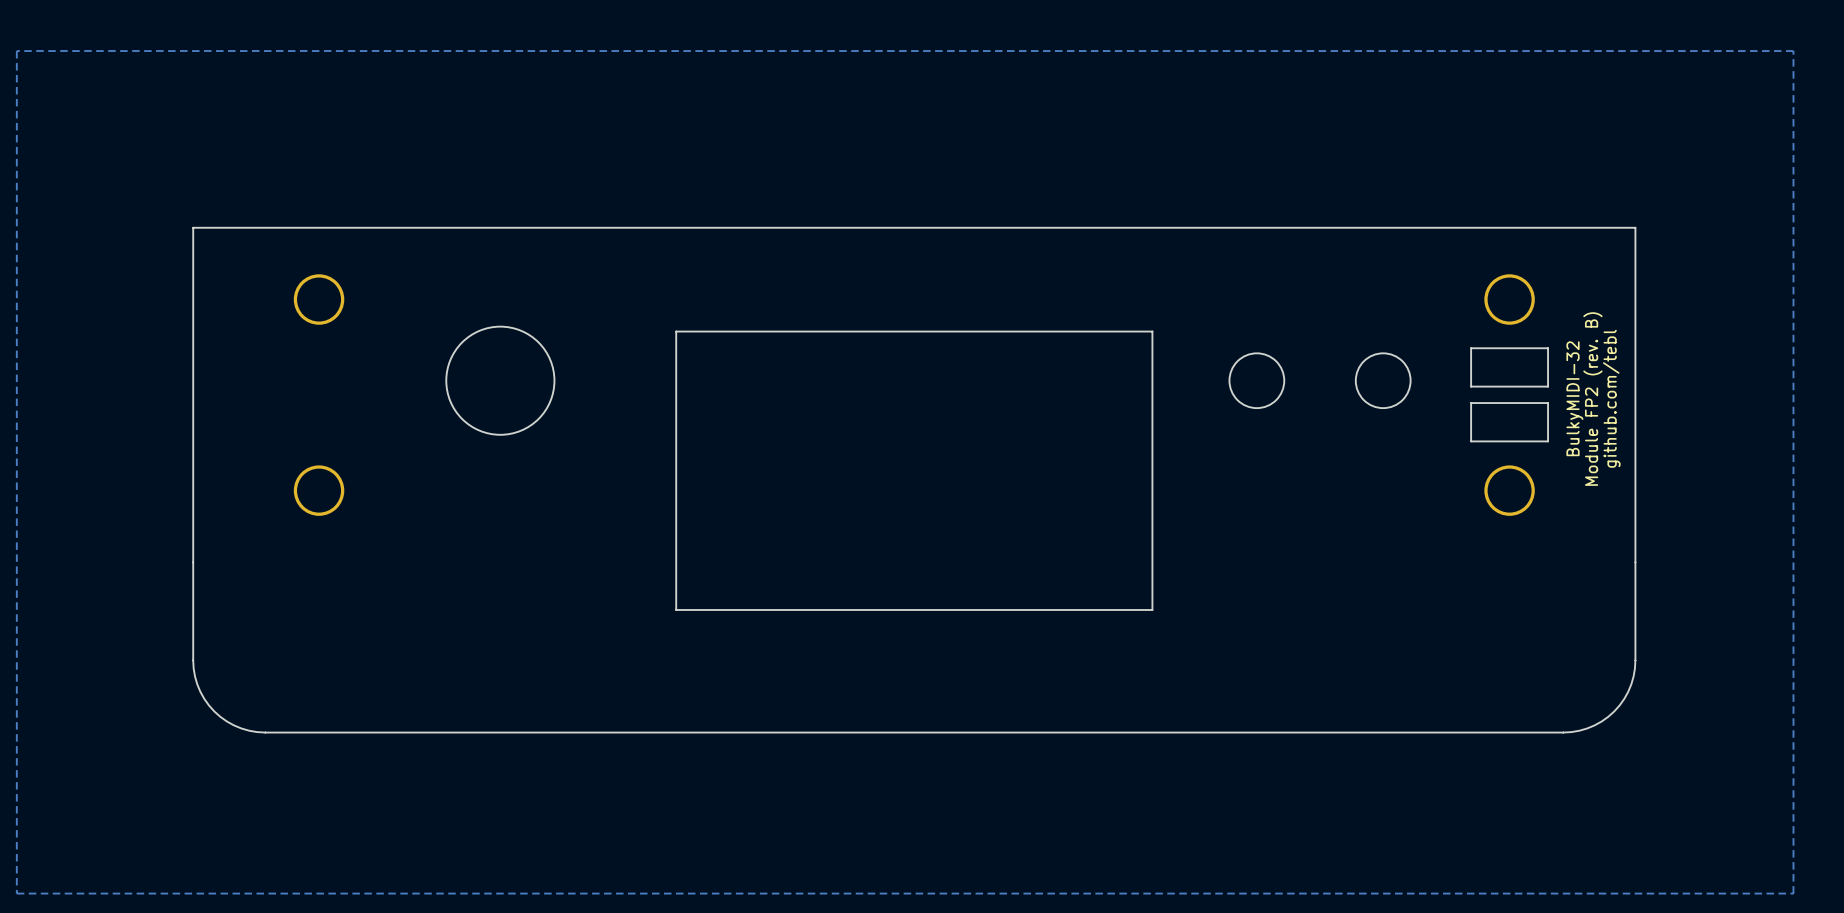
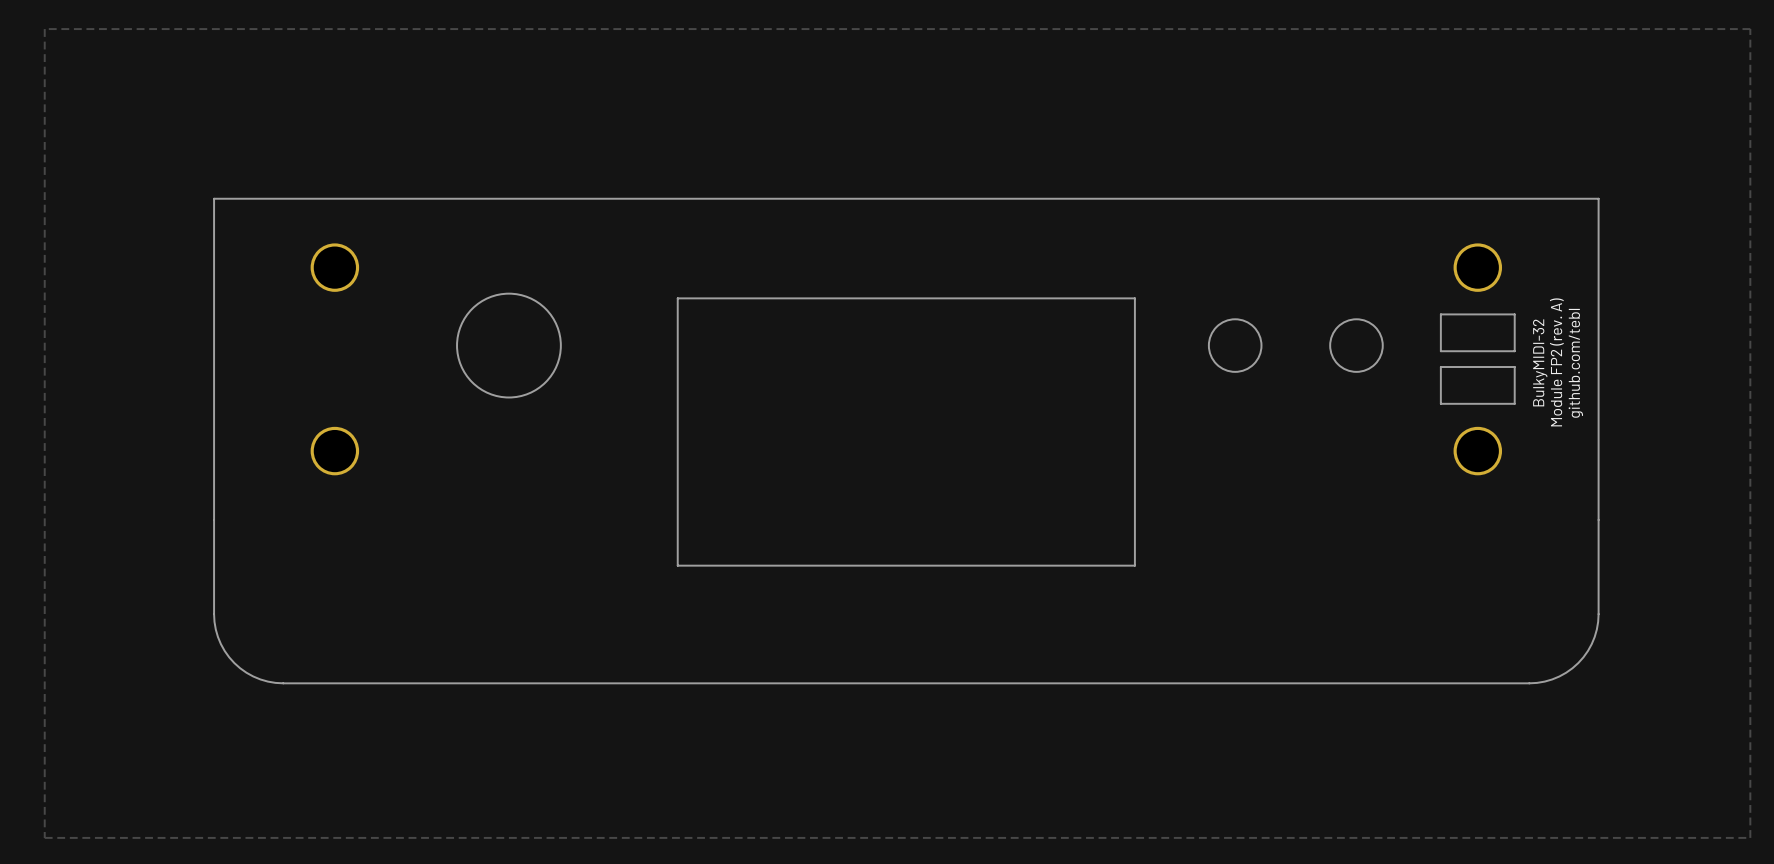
text: Module FP2 (rev. B) (1592, 399) -> Module FP2 (rev. A) (1556, 362)

